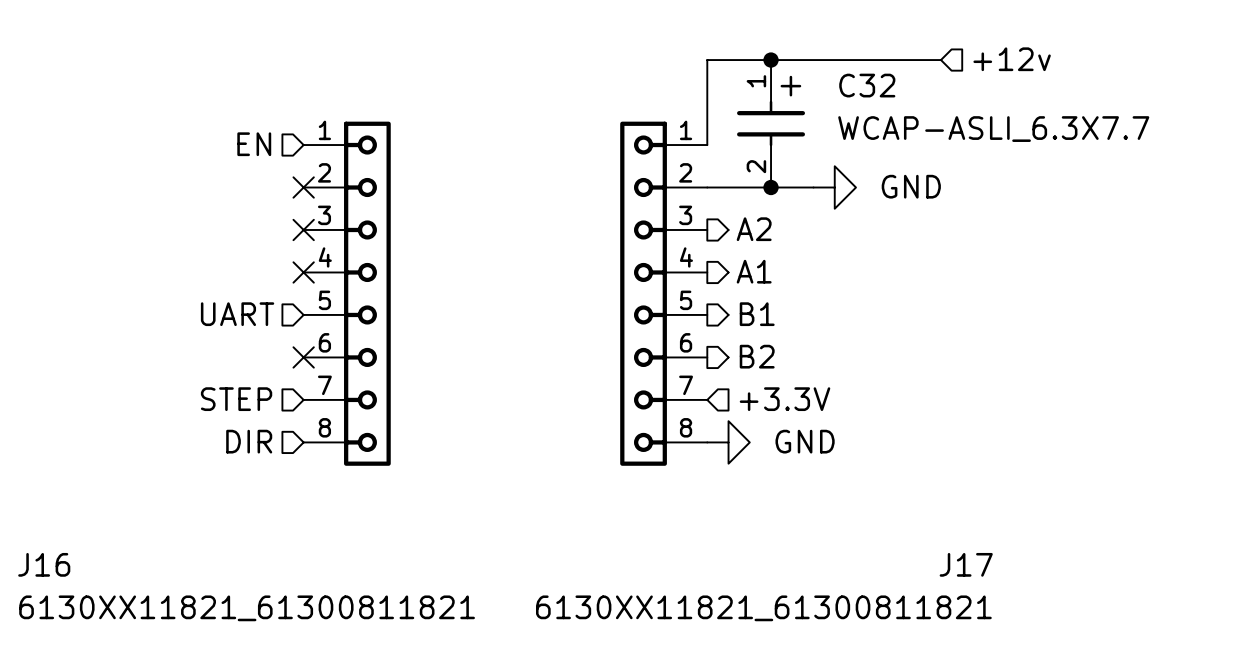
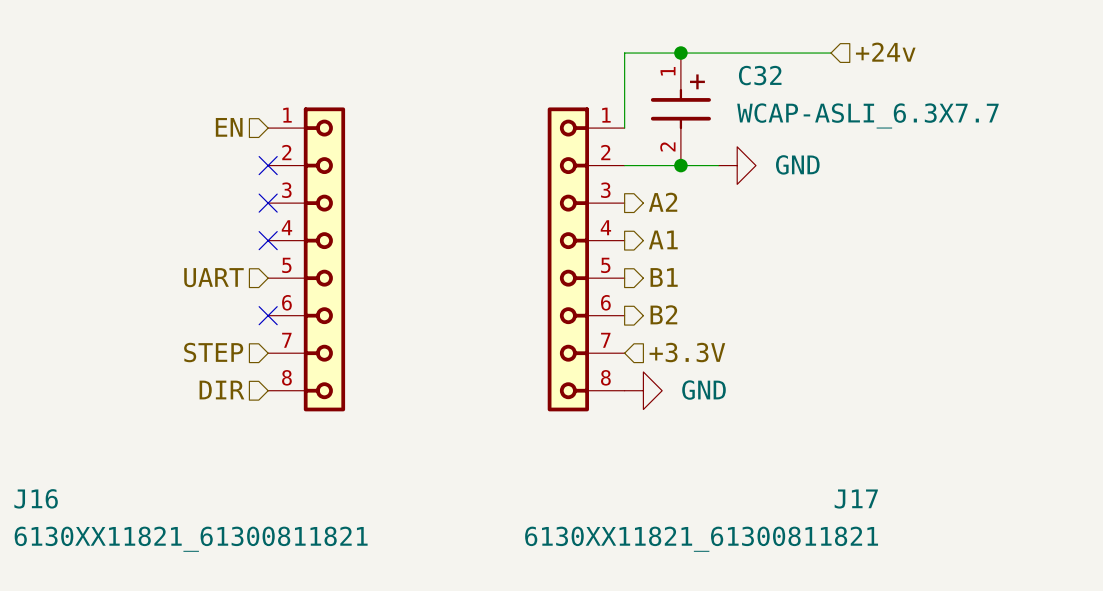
hierarchical label: +12v (1012, 59) -> +24v (885, 52)

